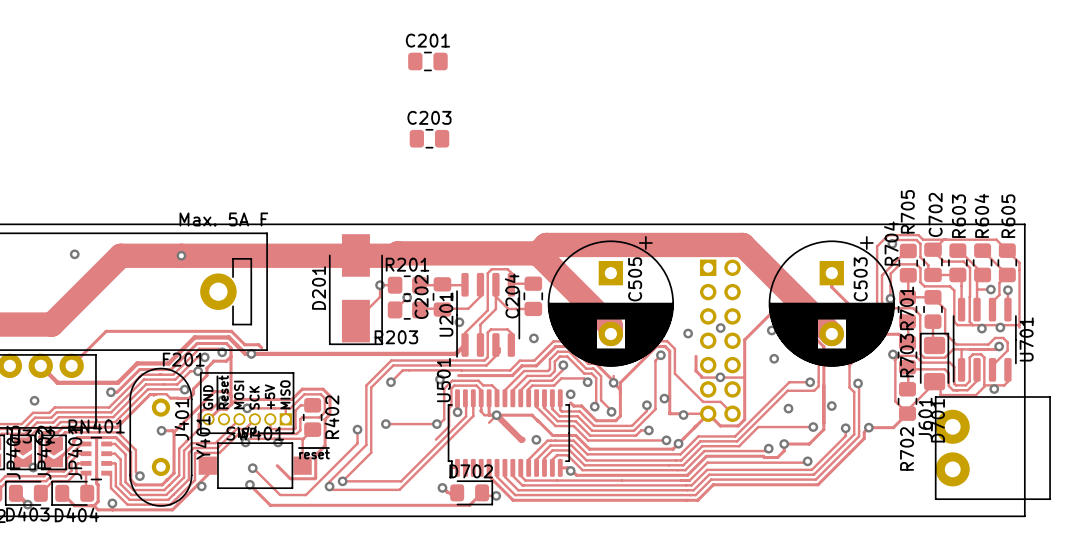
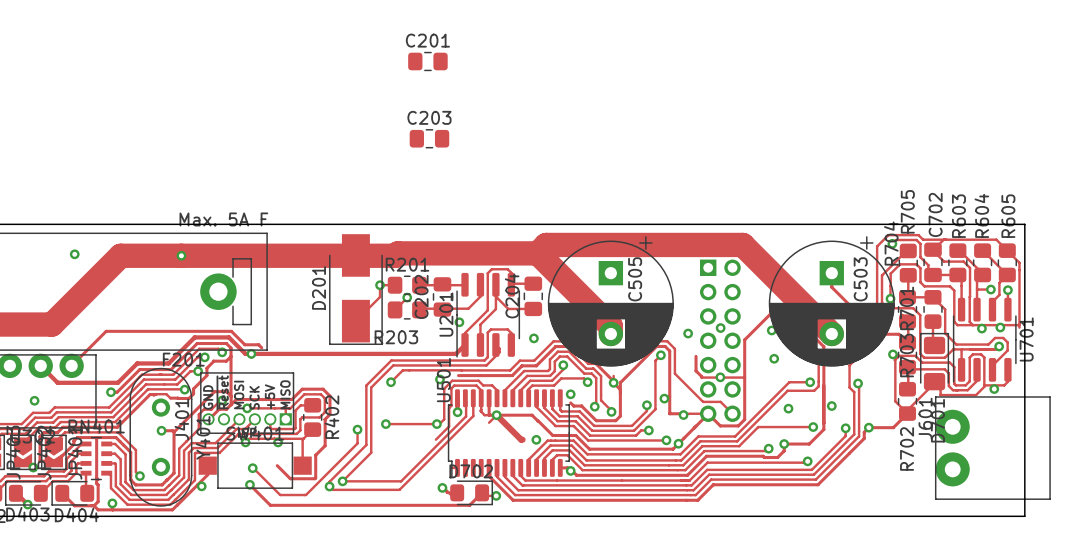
part: ~{reset} (313, 453) -> none

